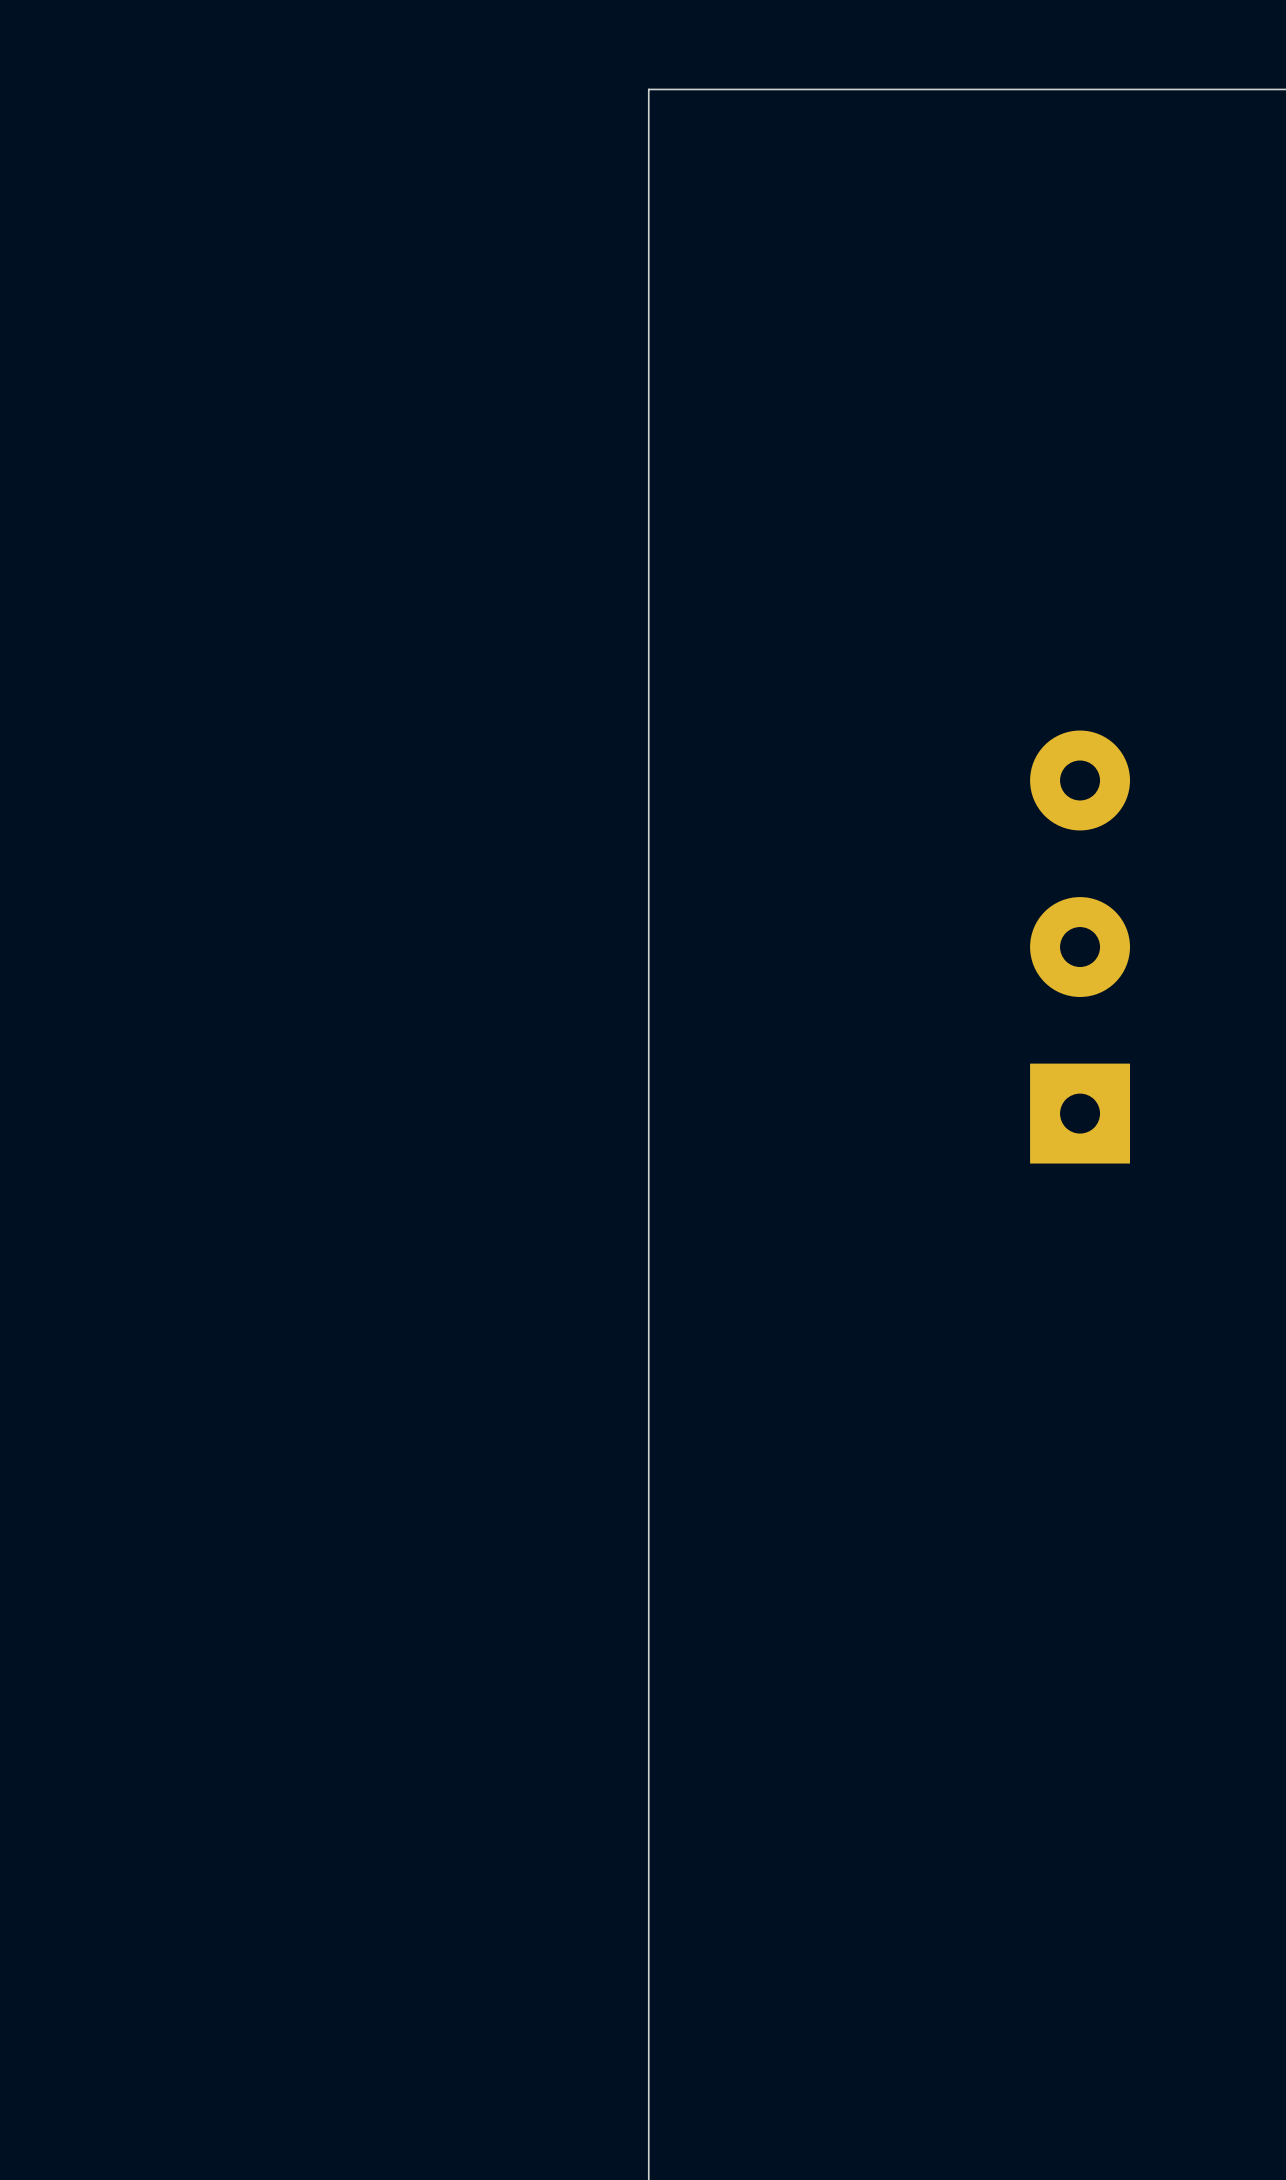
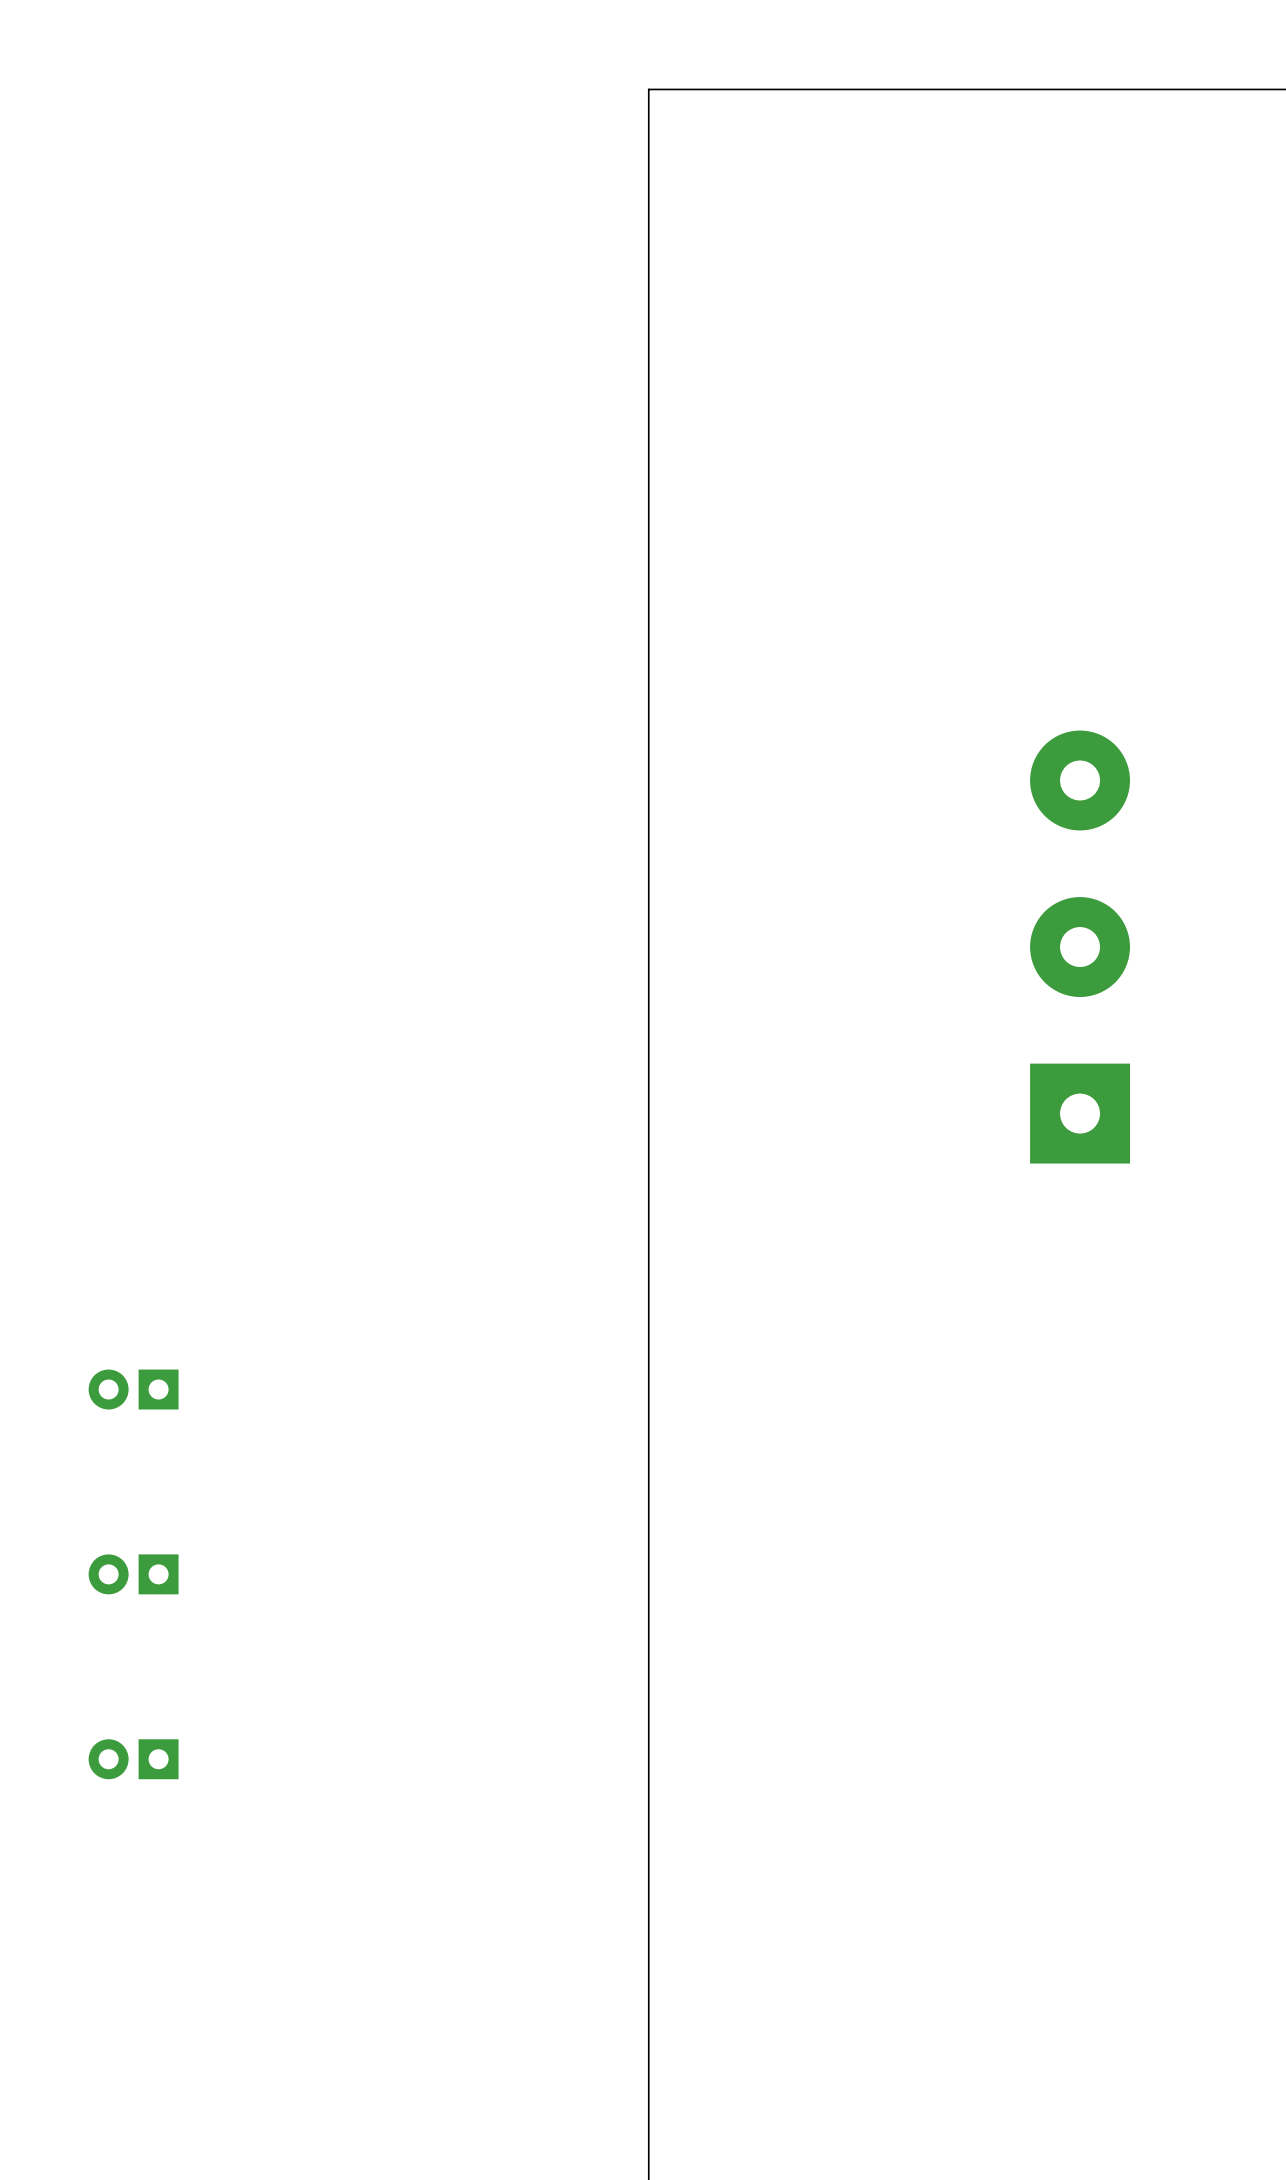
part: none -> (133, 1389)
part: none -> (133, 1574)
part: none -> (133, 1759)

